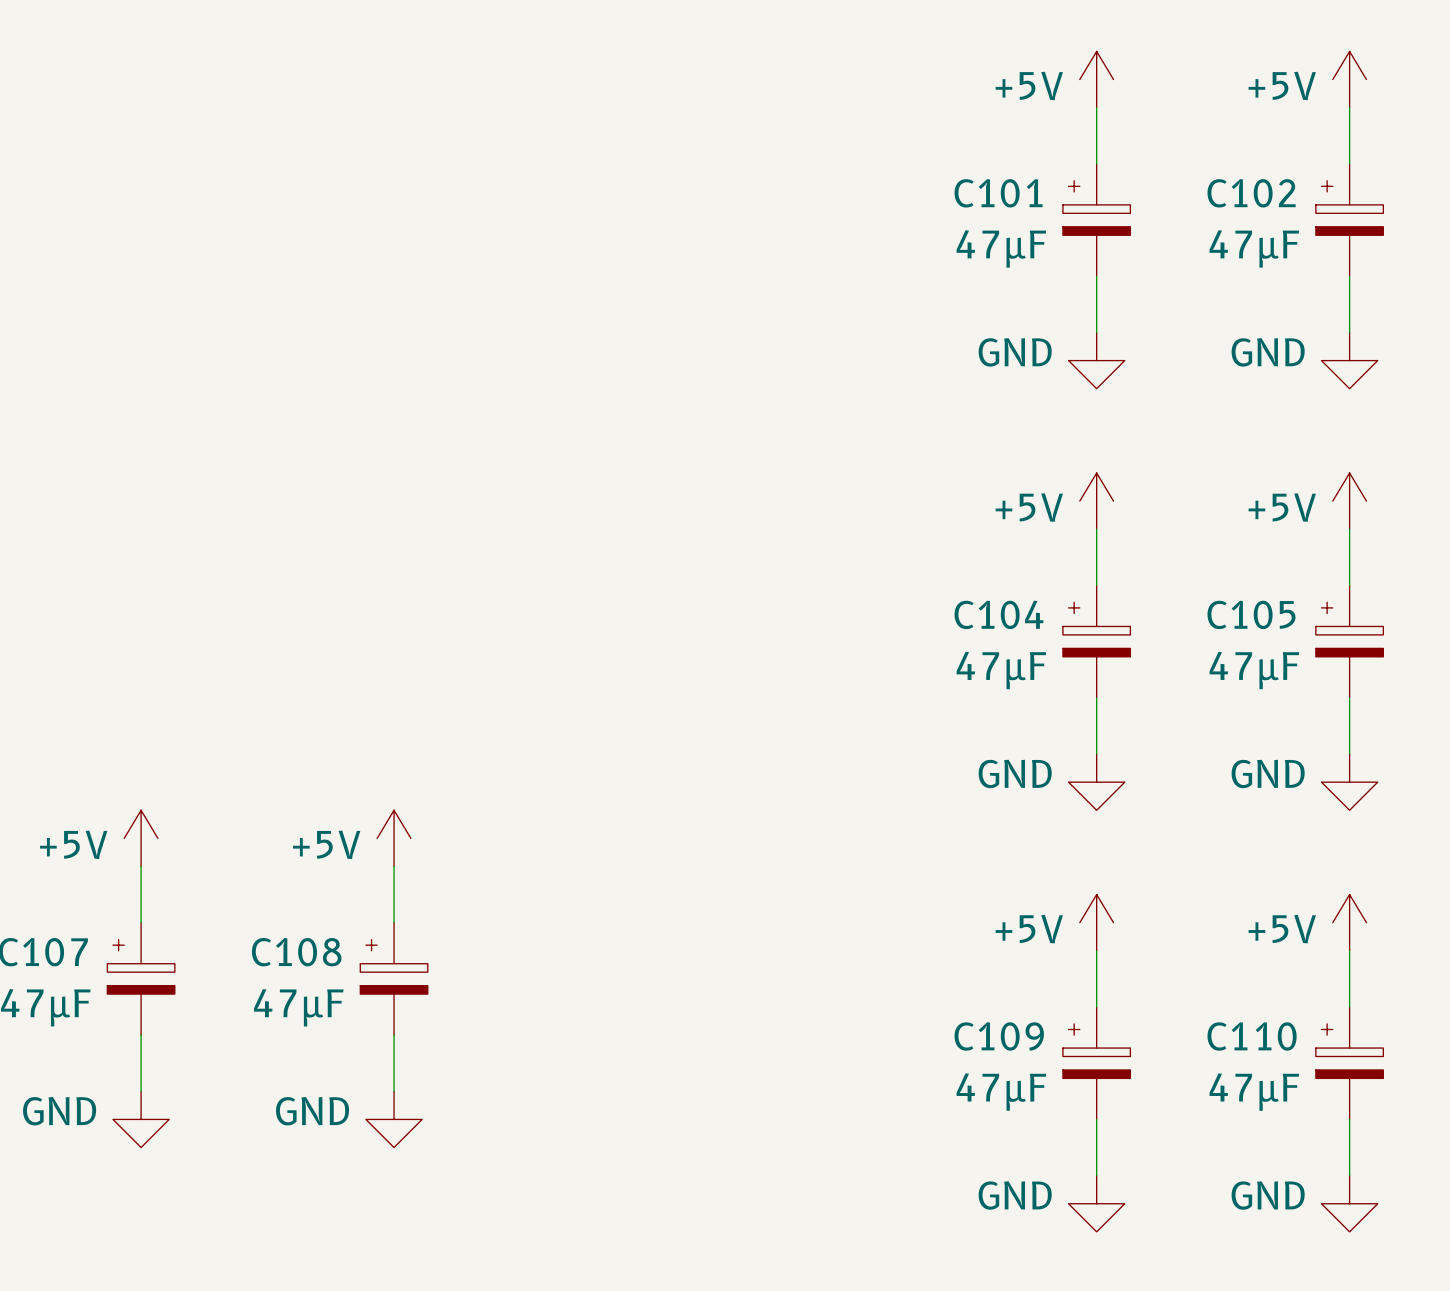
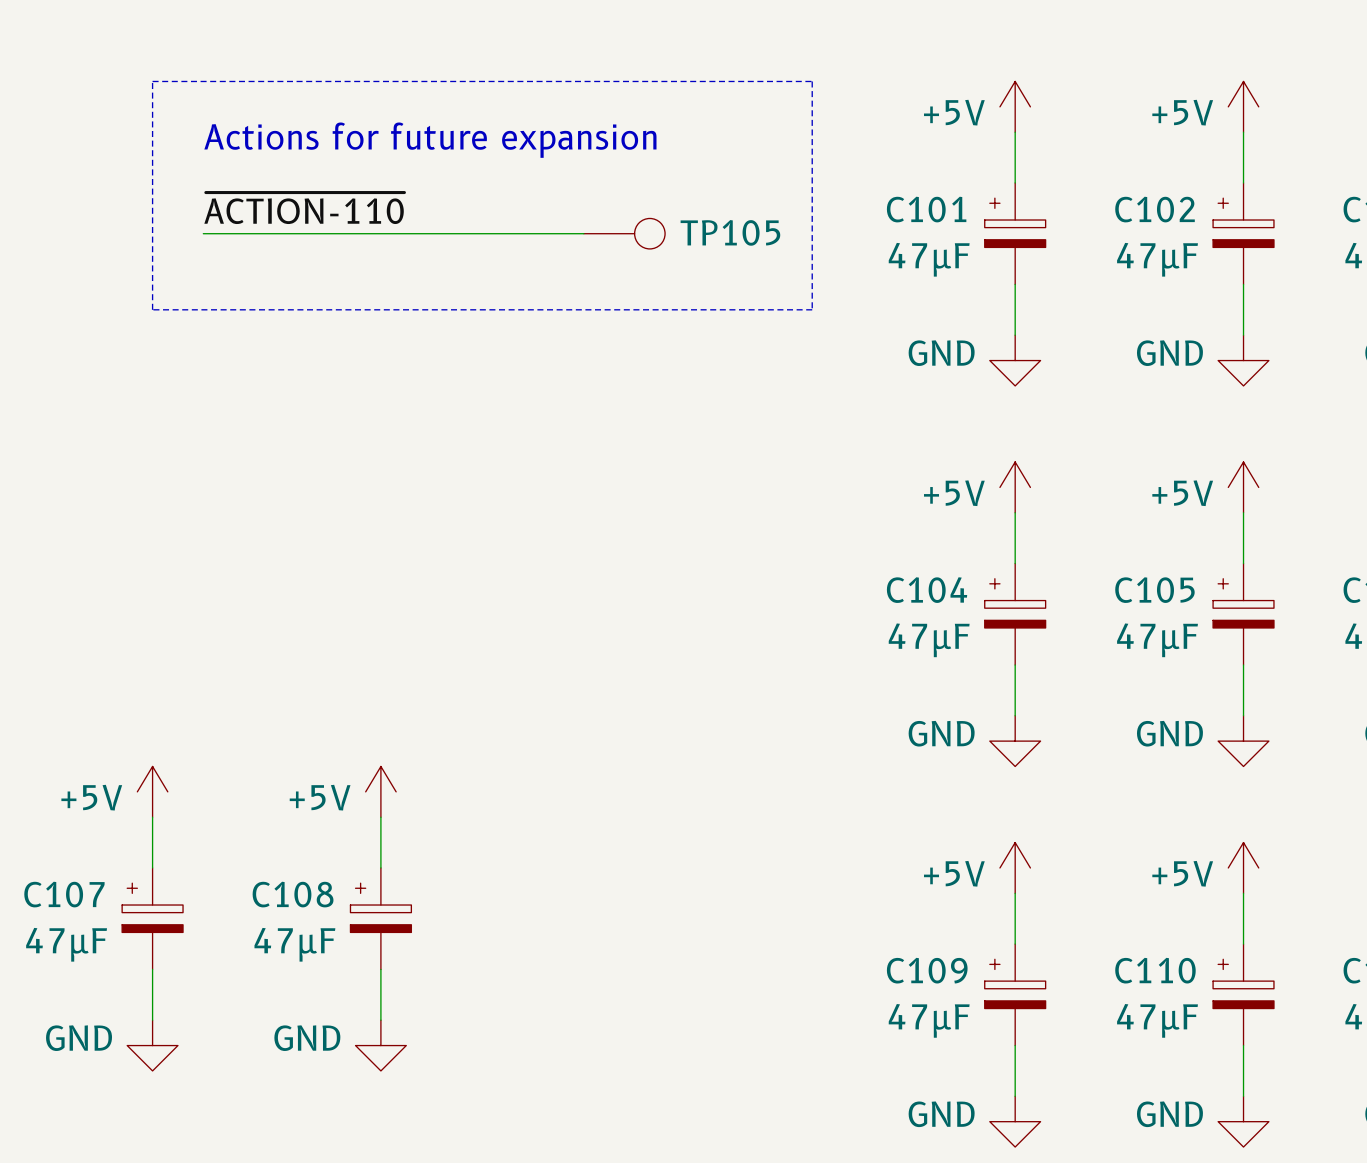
line: none -> (152, 81) (812, 81) (812, 309) (152, 309) (152, 81)
text: none -> Actions for future expansion (430, 140)
label: none -> ~{ACTION-110} (304, 208)
wire: none -> (203, 233) (583, 233)
TP105: none -> (624, 233)

